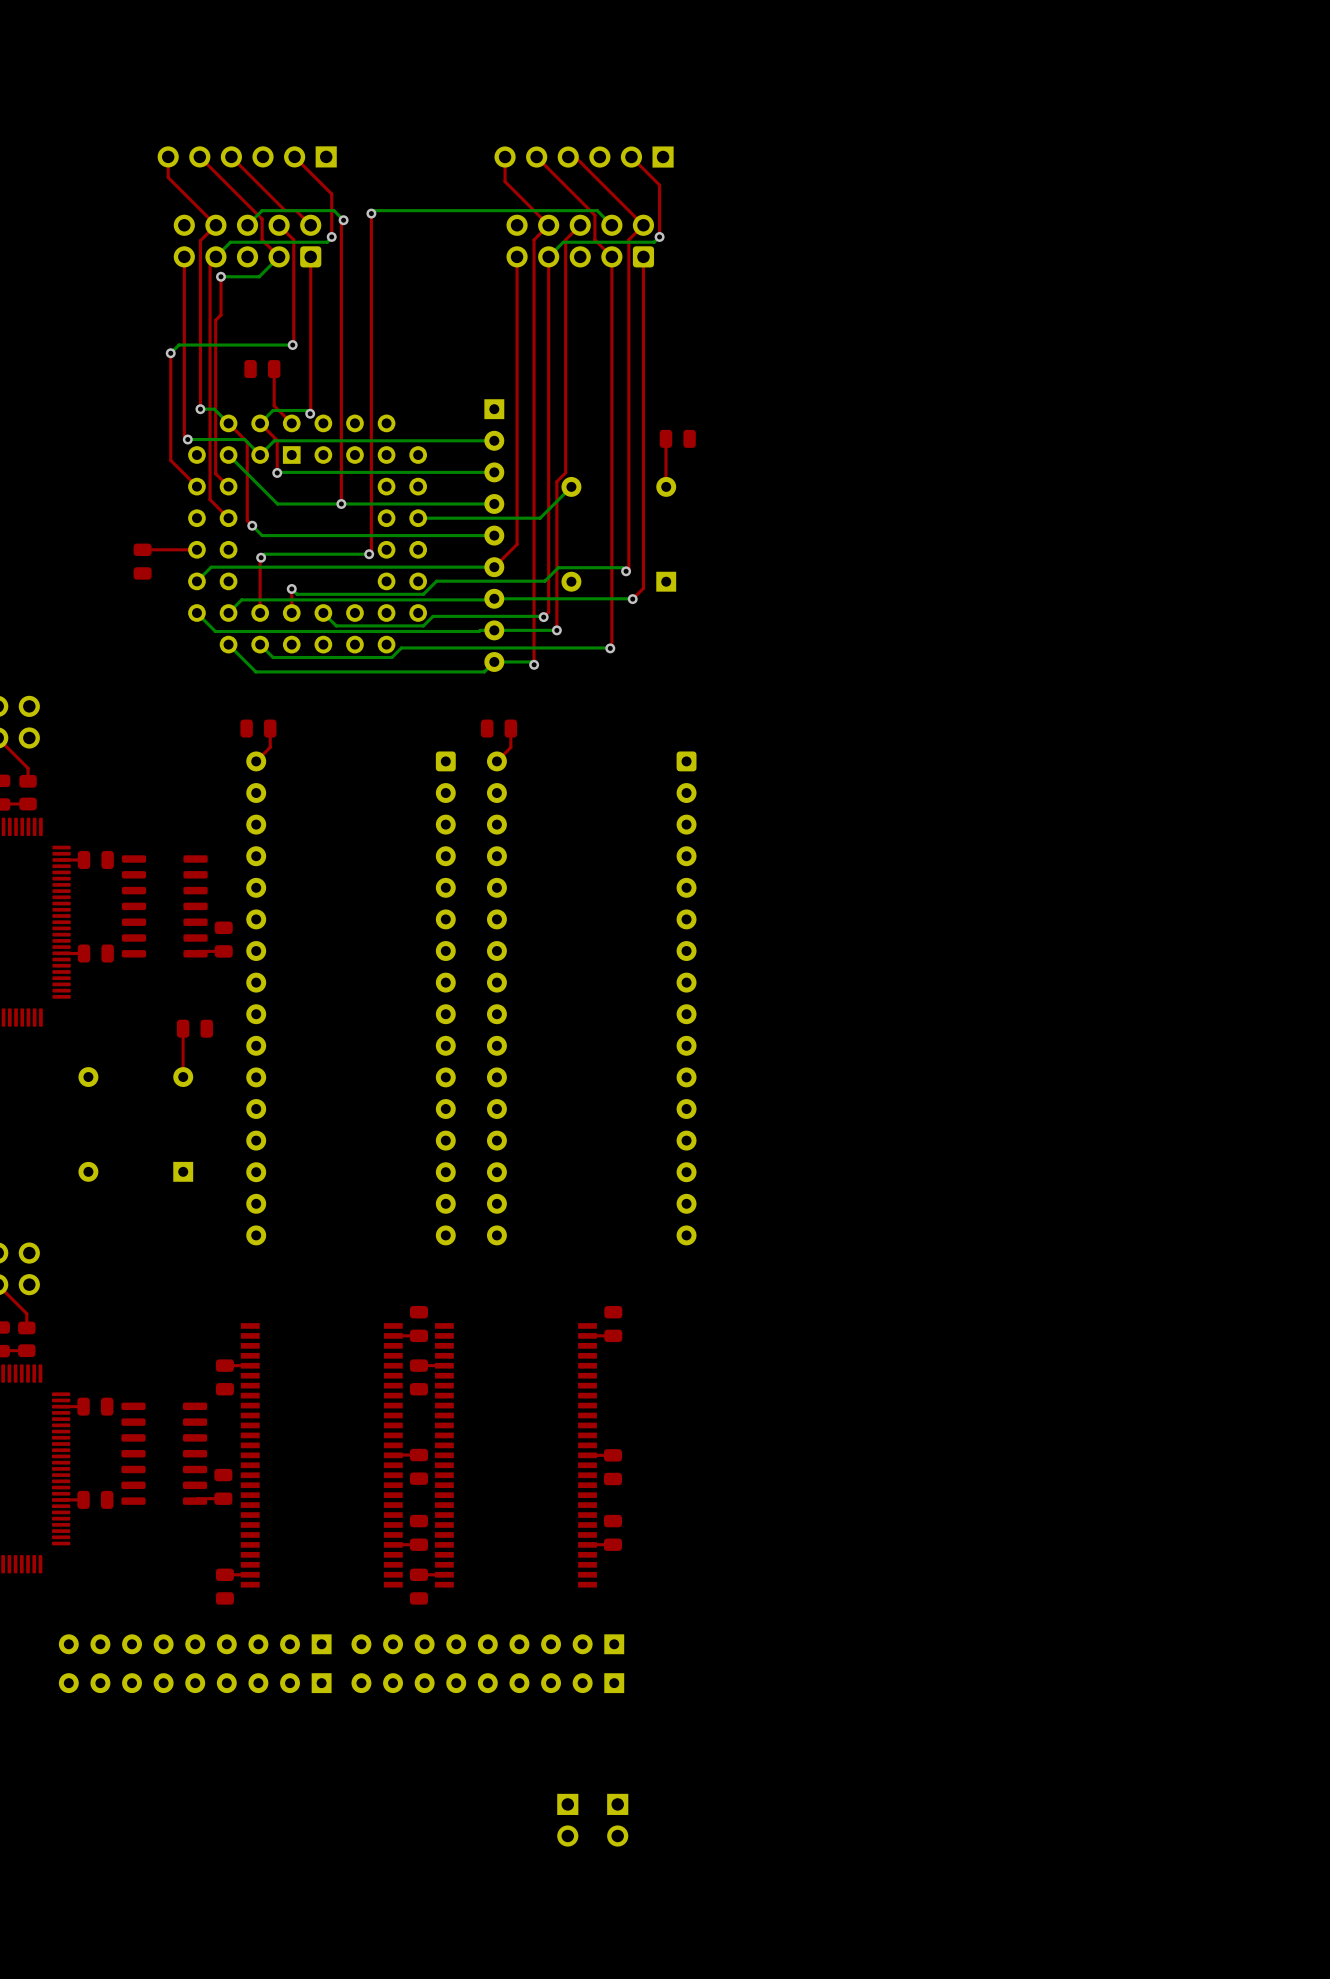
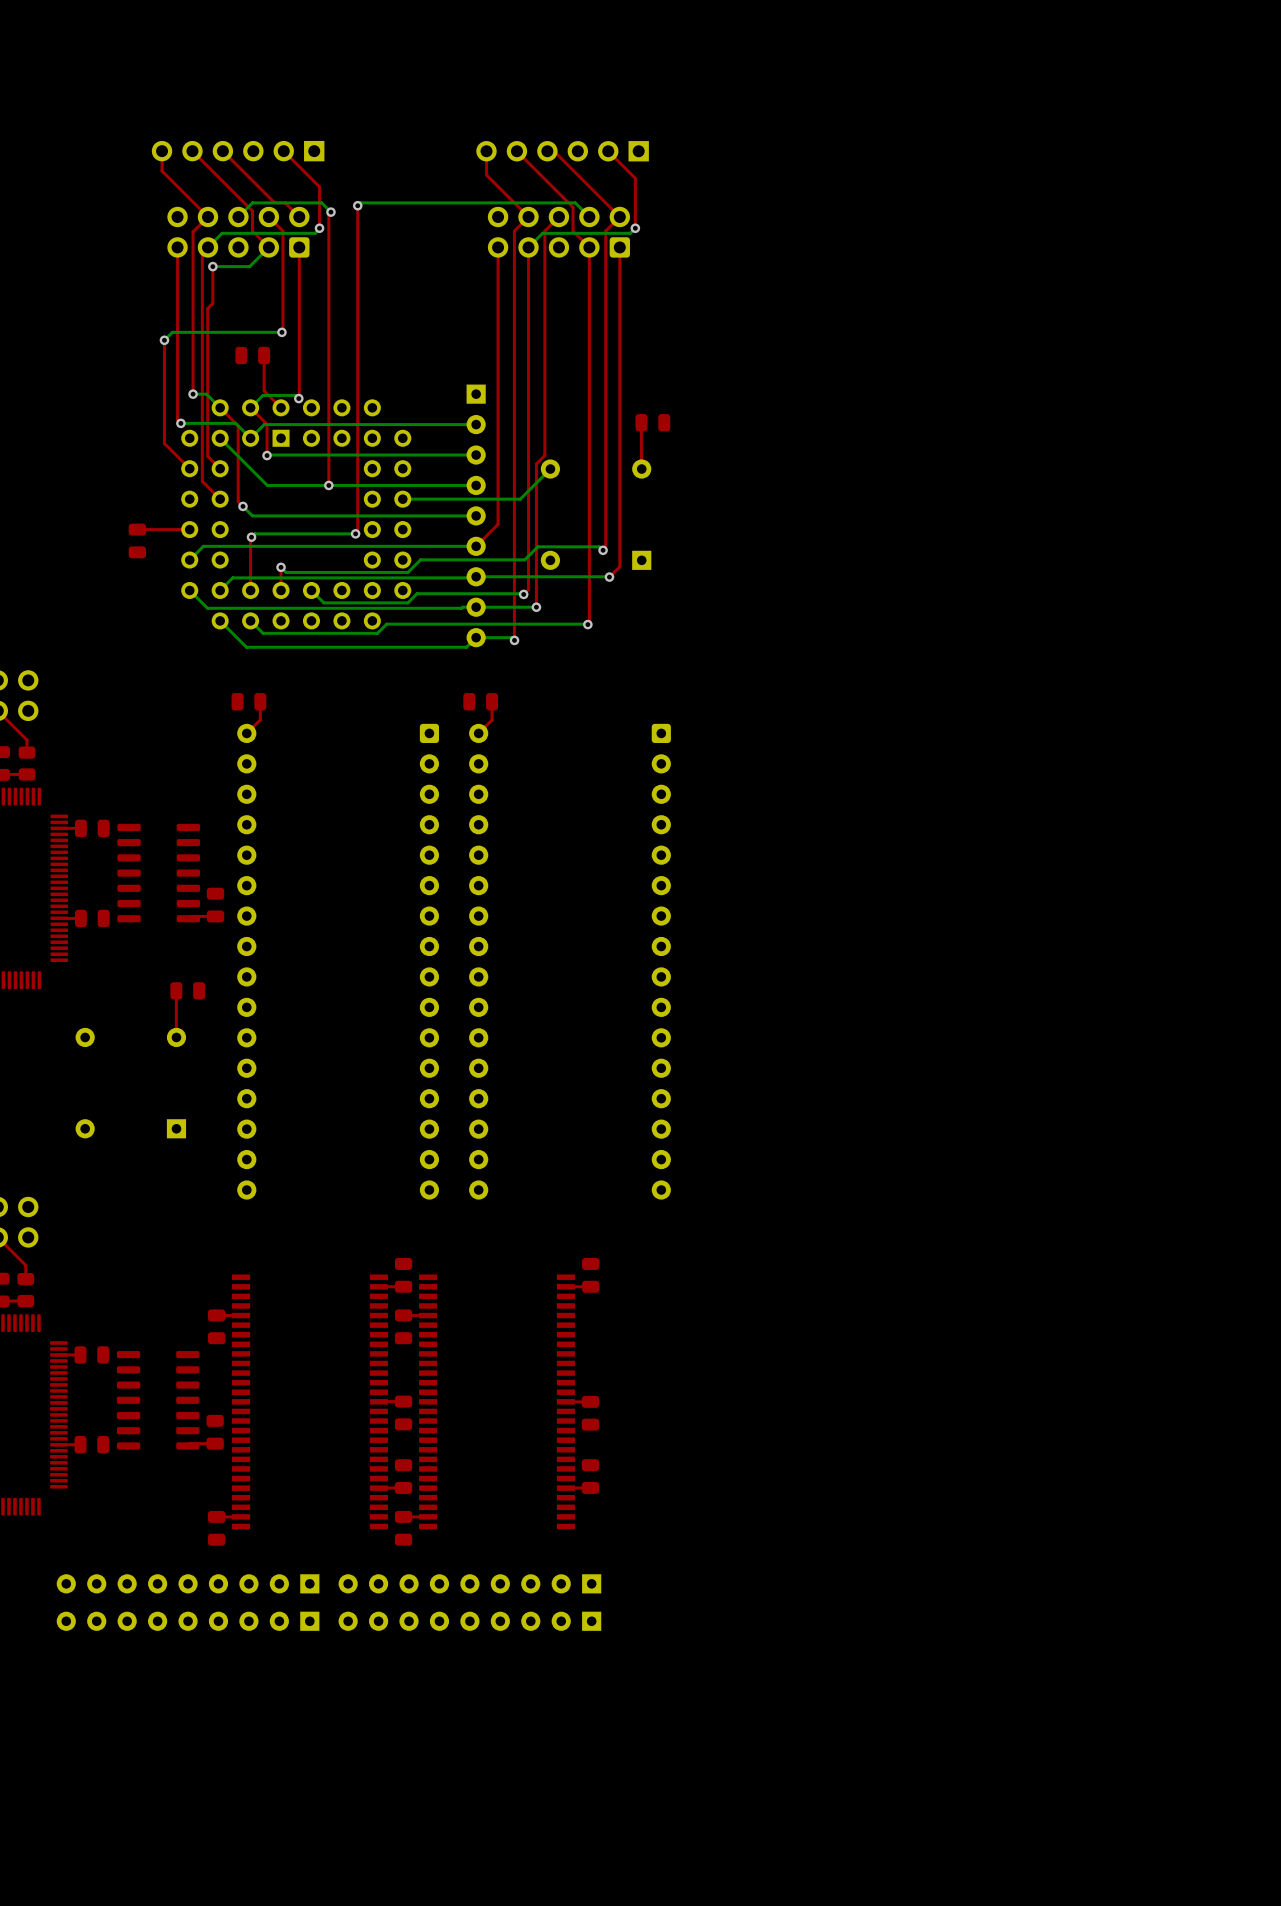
part: (567, 1820) -> none
part: (617, 1820) -> none

